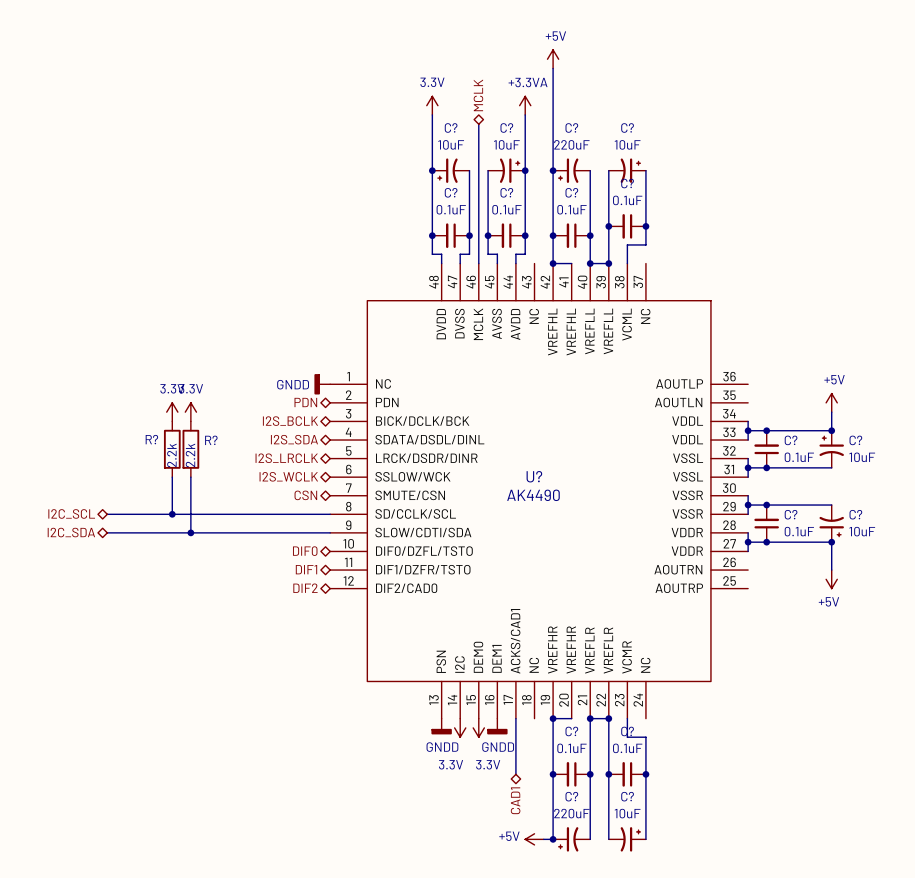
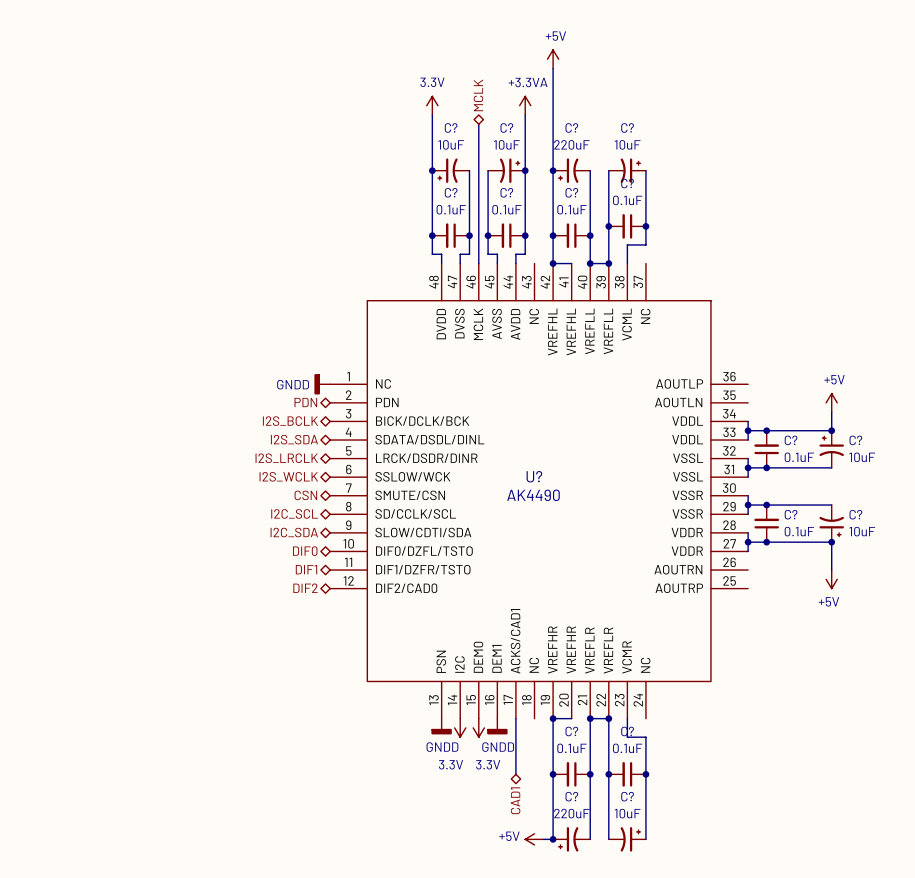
power symbol: 3.3V (172, 412) -> none
power symbol: 3.3V (190, 412) -> none
R?: 2.2k (172, 449) -> none
R?: 2.2k (190, 449) -> none
wire: (172, 477) (172, 514) -> none
wire: (190, 477) (190, 532) -> none
hierarchical label: I2C_SCL (71, 513) -> none
hierarchical label: none -> I2C_SCL (294, 513)
wire: (107, 514) (330, 514) -> none
junction: (172, 514) -> none
hierarchical label: I2C_SDA (71, 532) -> none
wire: (107, 532) (330, 532) -> none
junction: (190, 532) -> none
hierarchical label: none -> I2C_SDA (294, 532)

